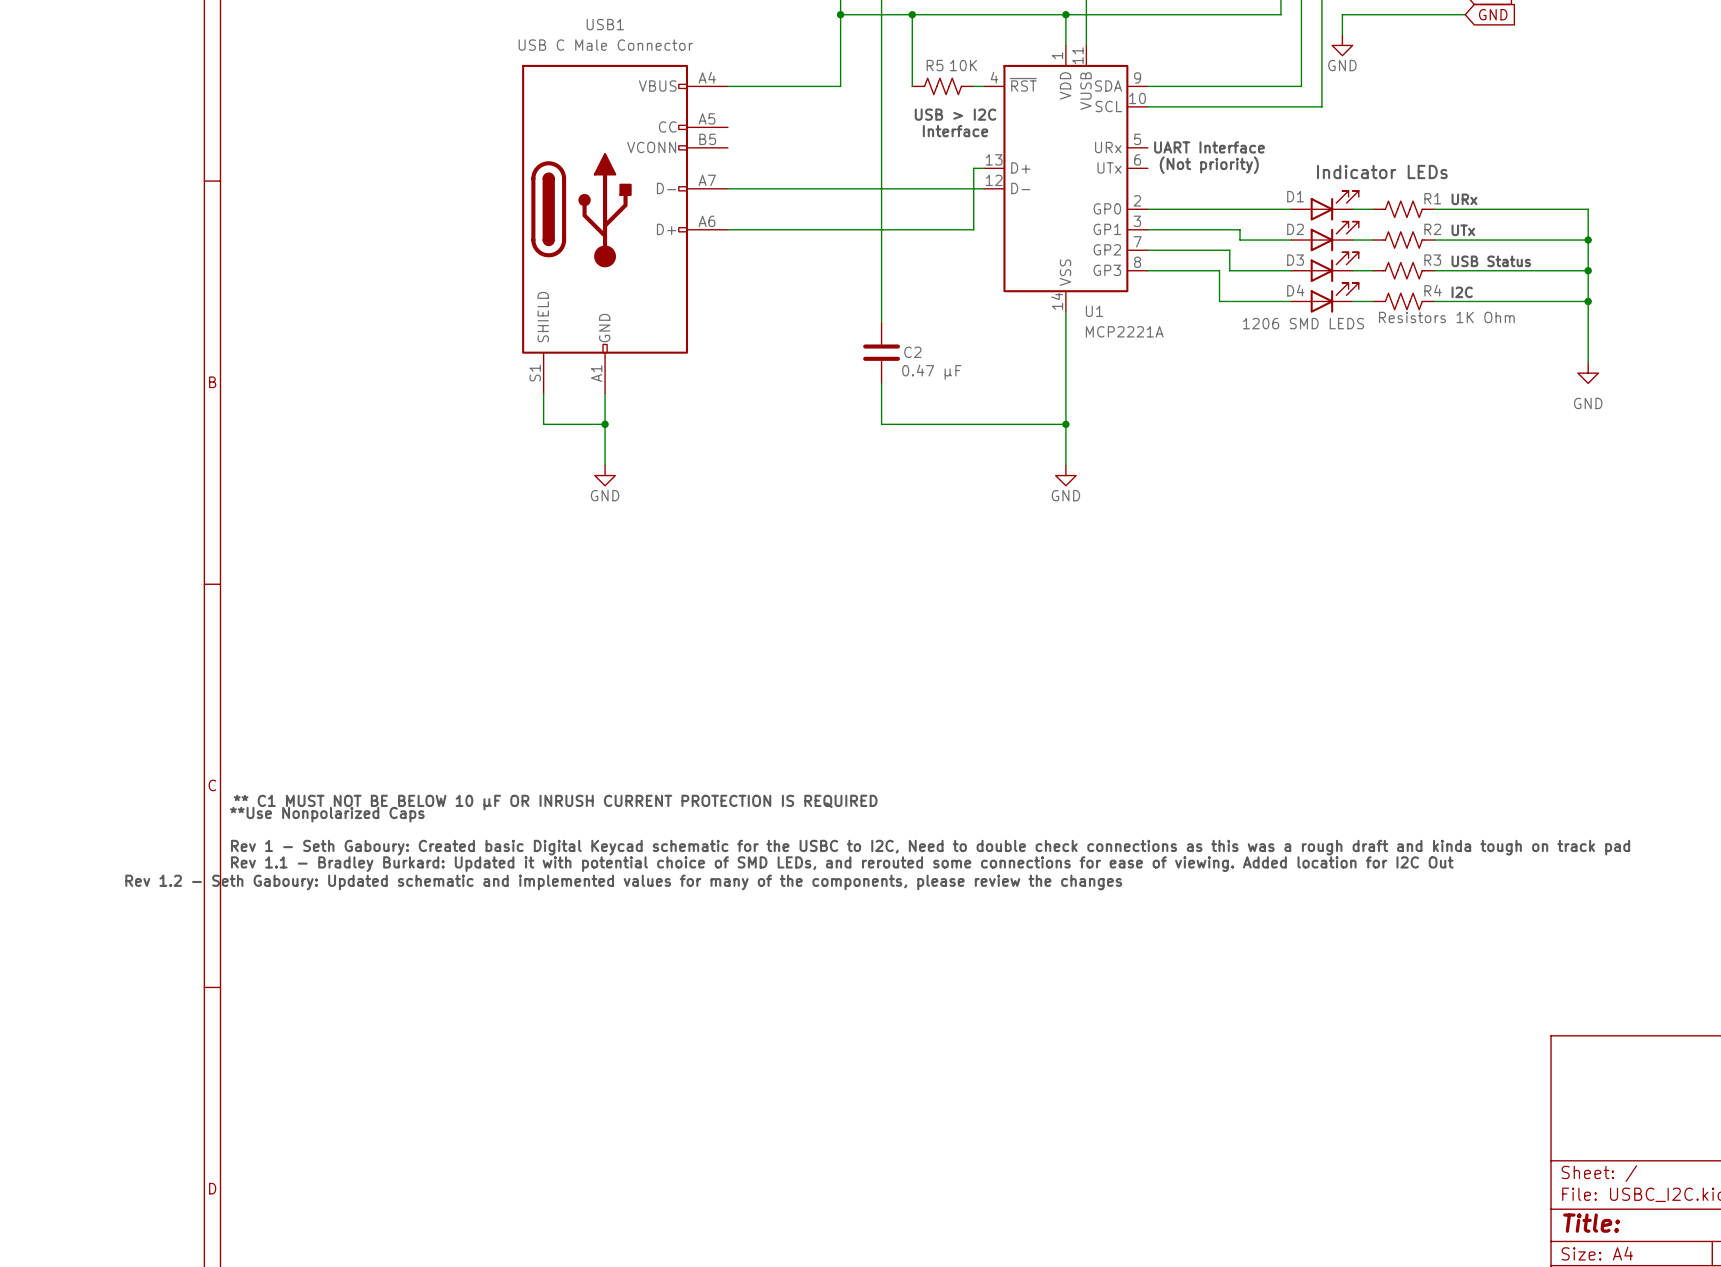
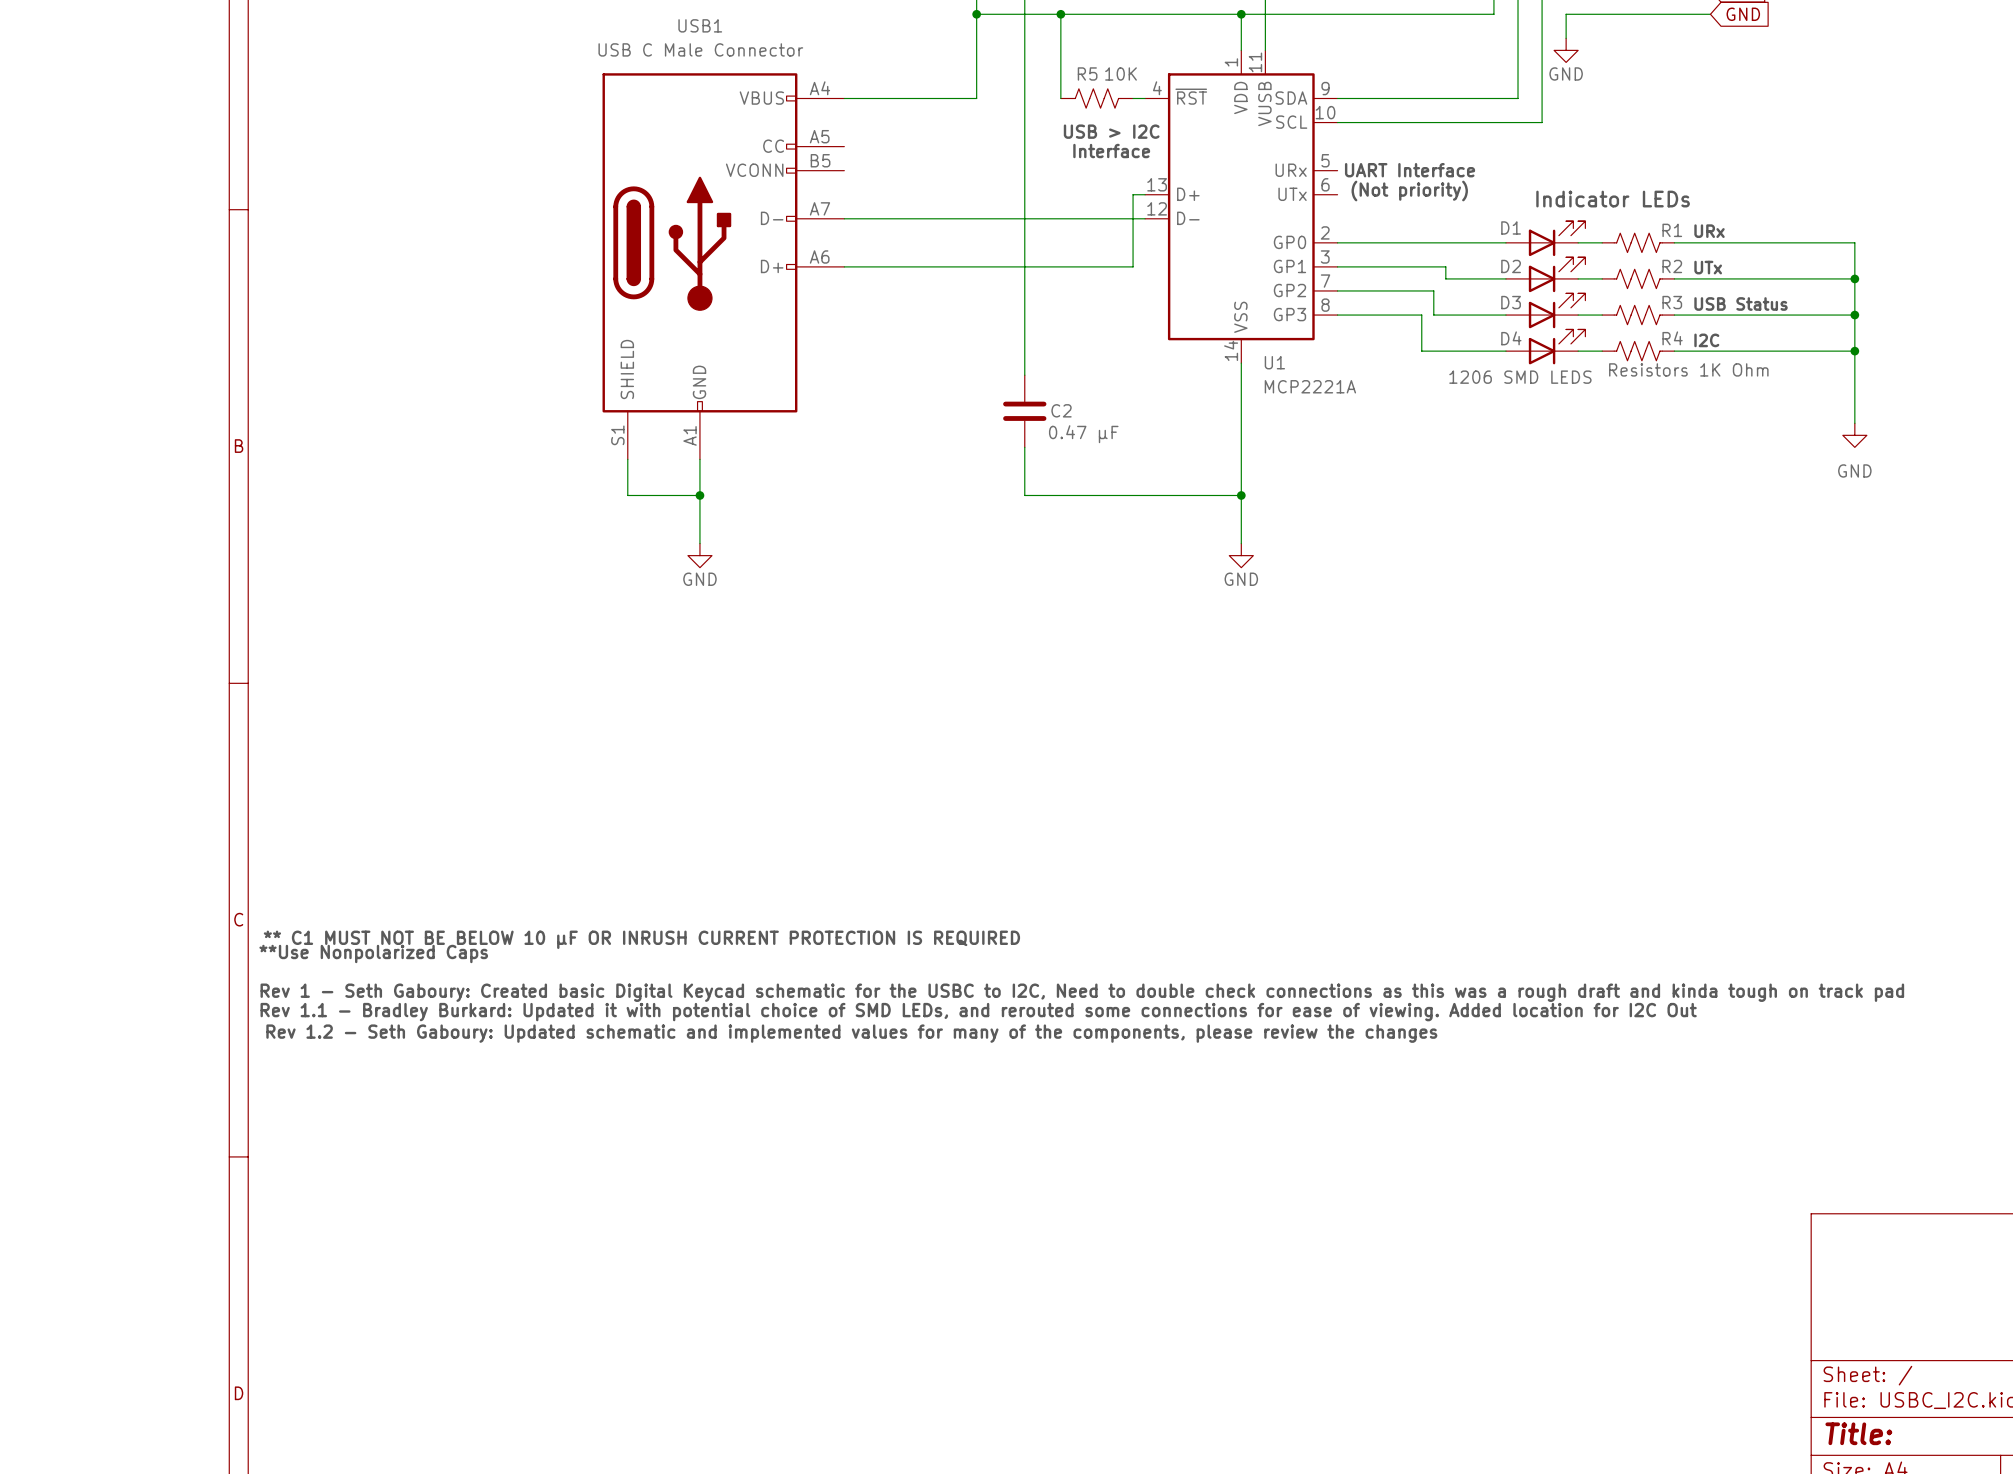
text position: Rev 1.2 - Seth Gaboury: Updated schematic and implemented values for many of the components, please review the changes (623, 882) -> Rev 1.2 - Seth Gaboury: Updated schematic and implemented values for many of the components, please review the changes (851, 1033)

